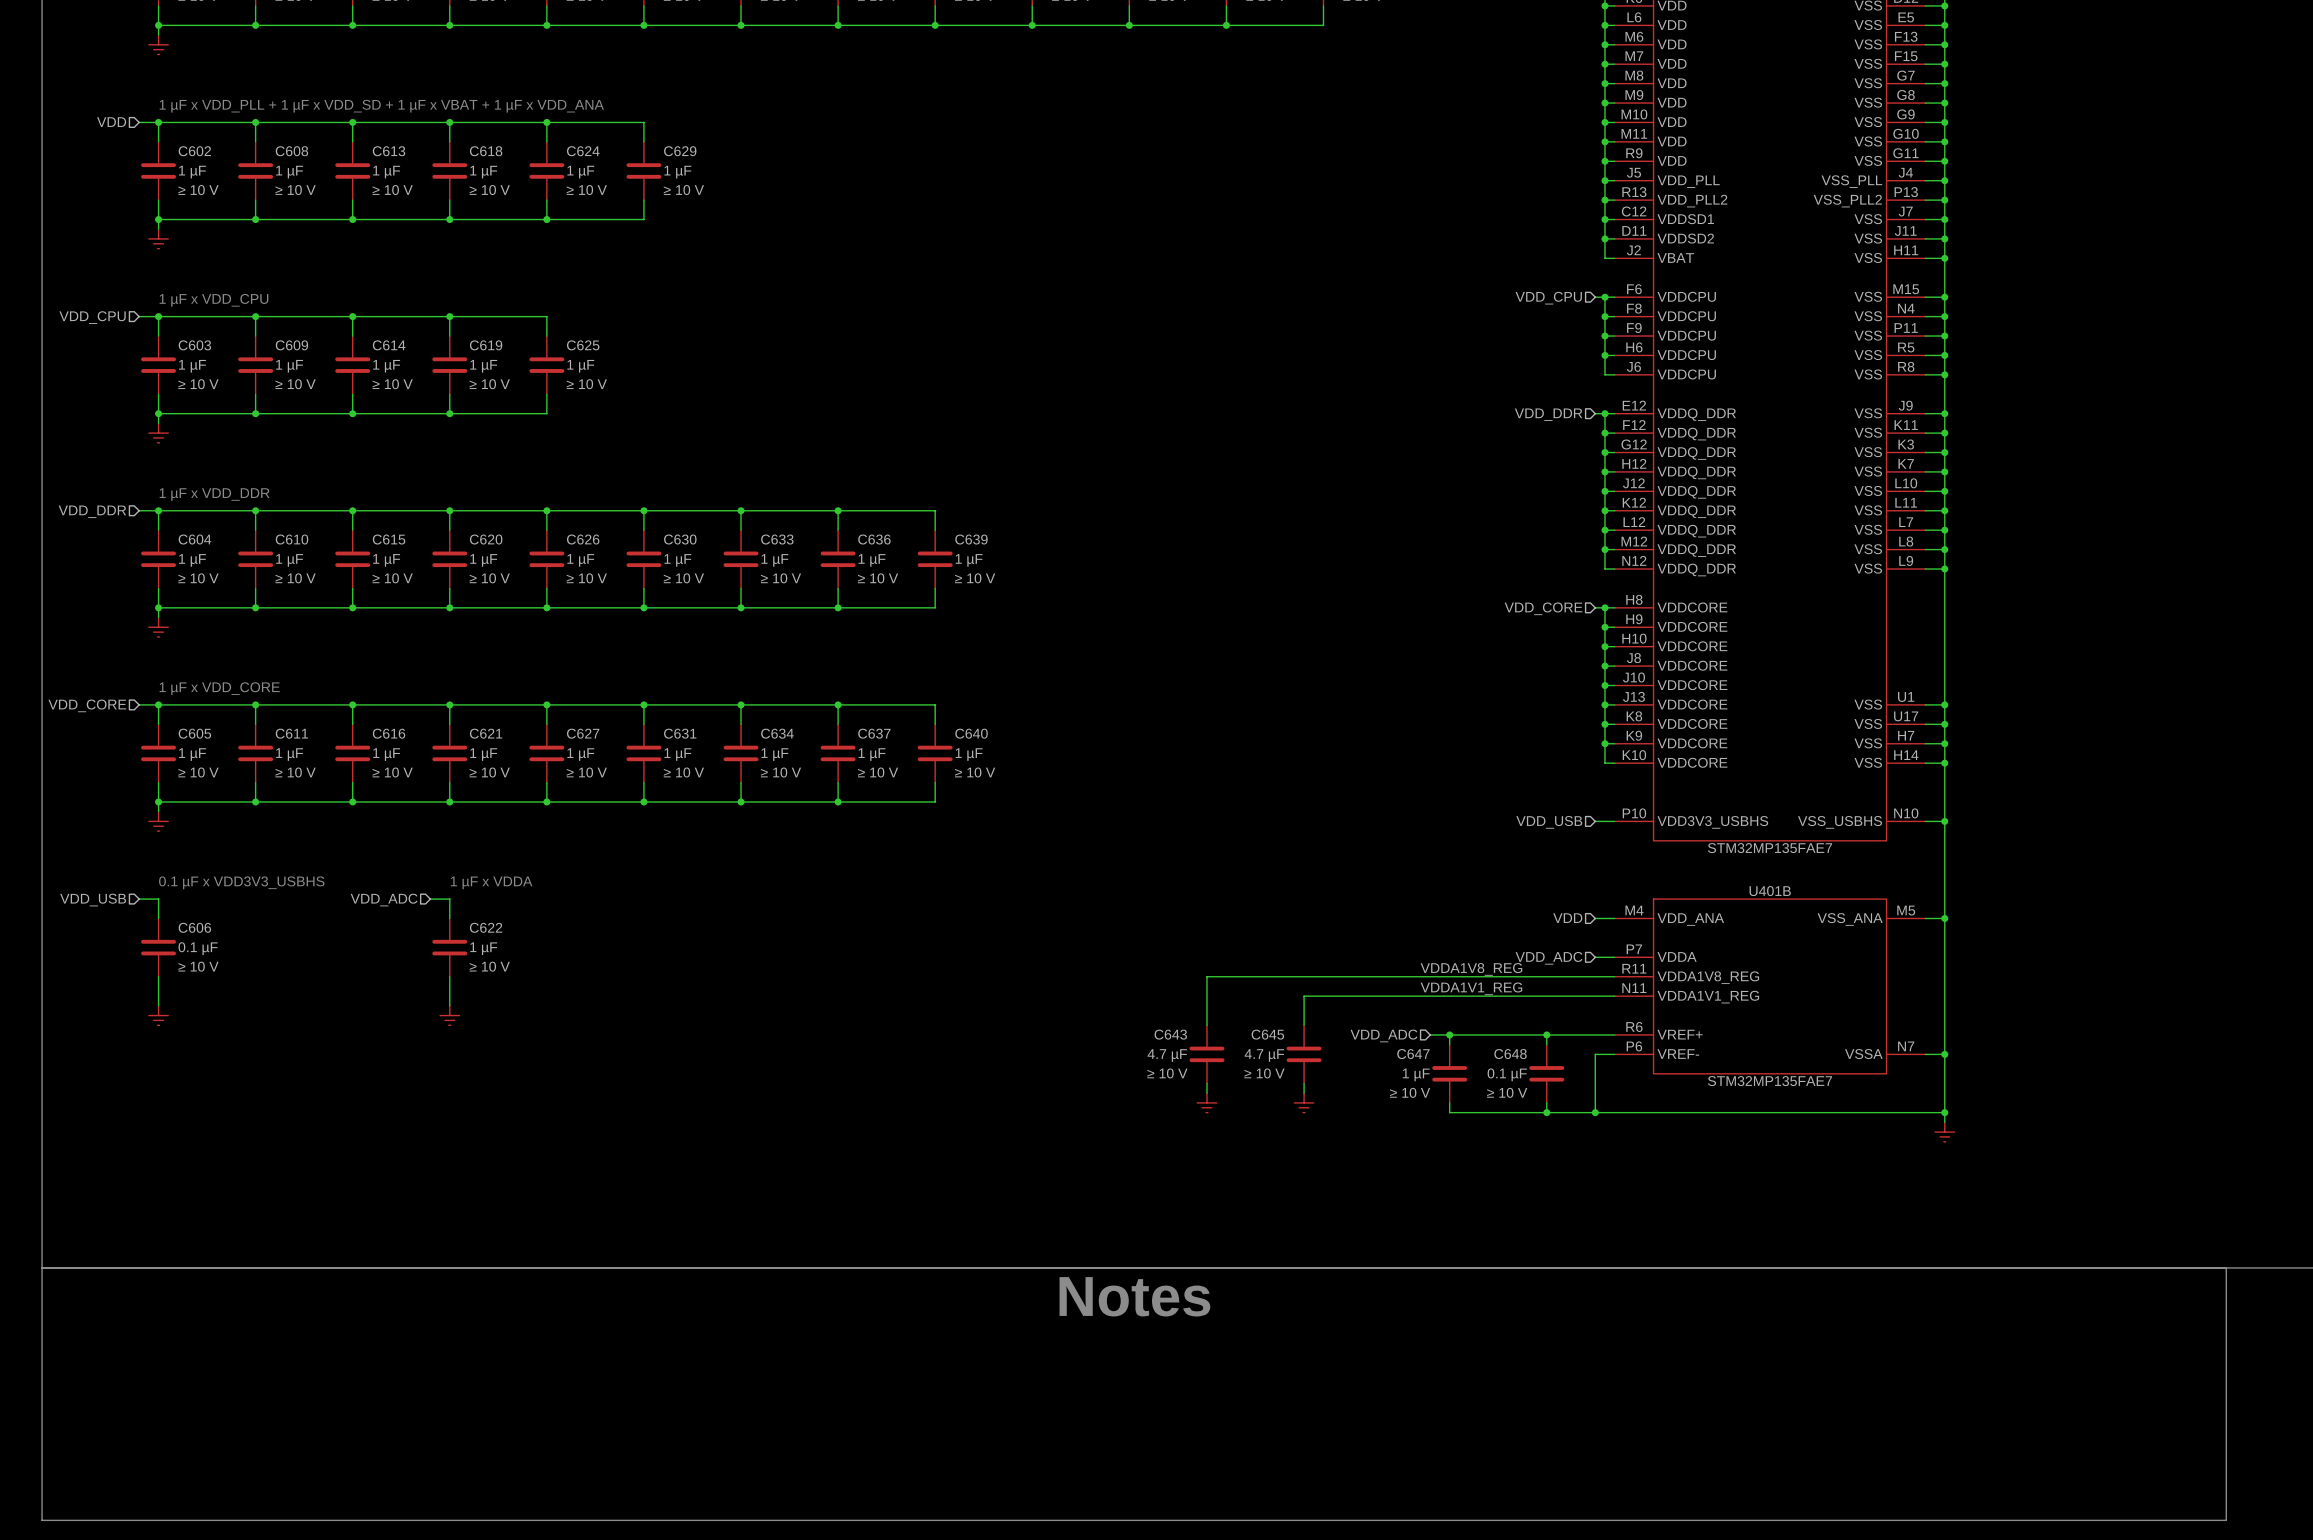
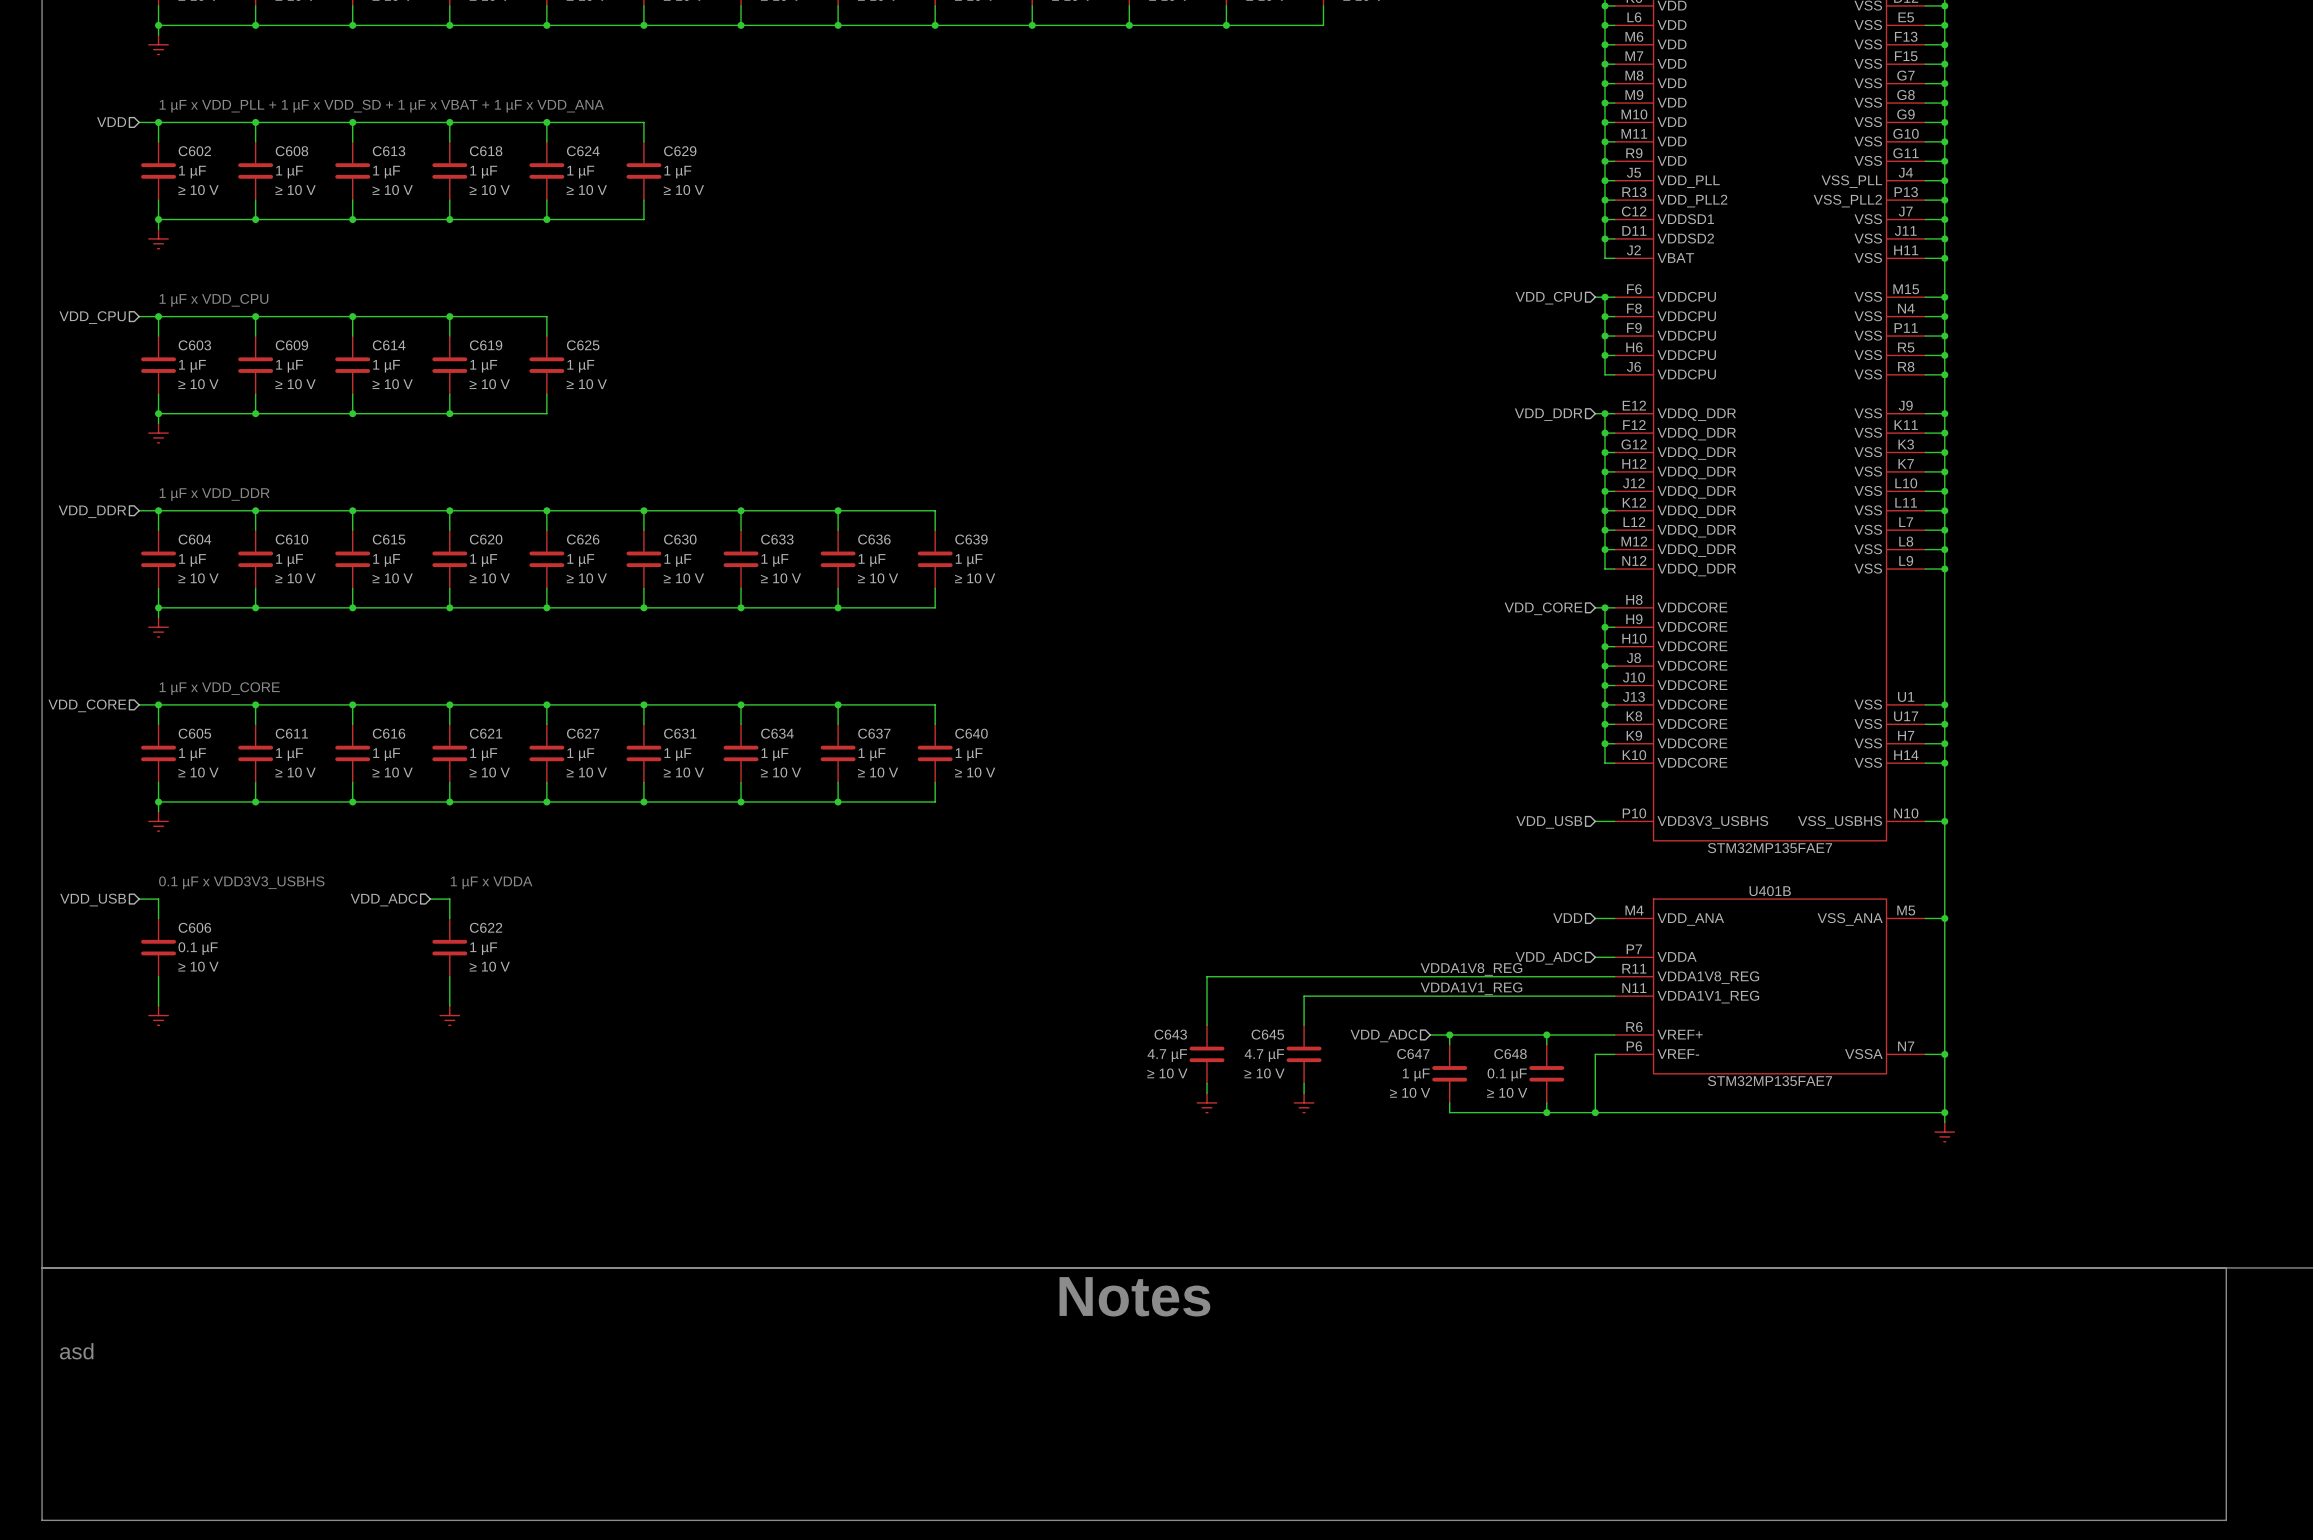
text: none -> asd (76, 1351)

